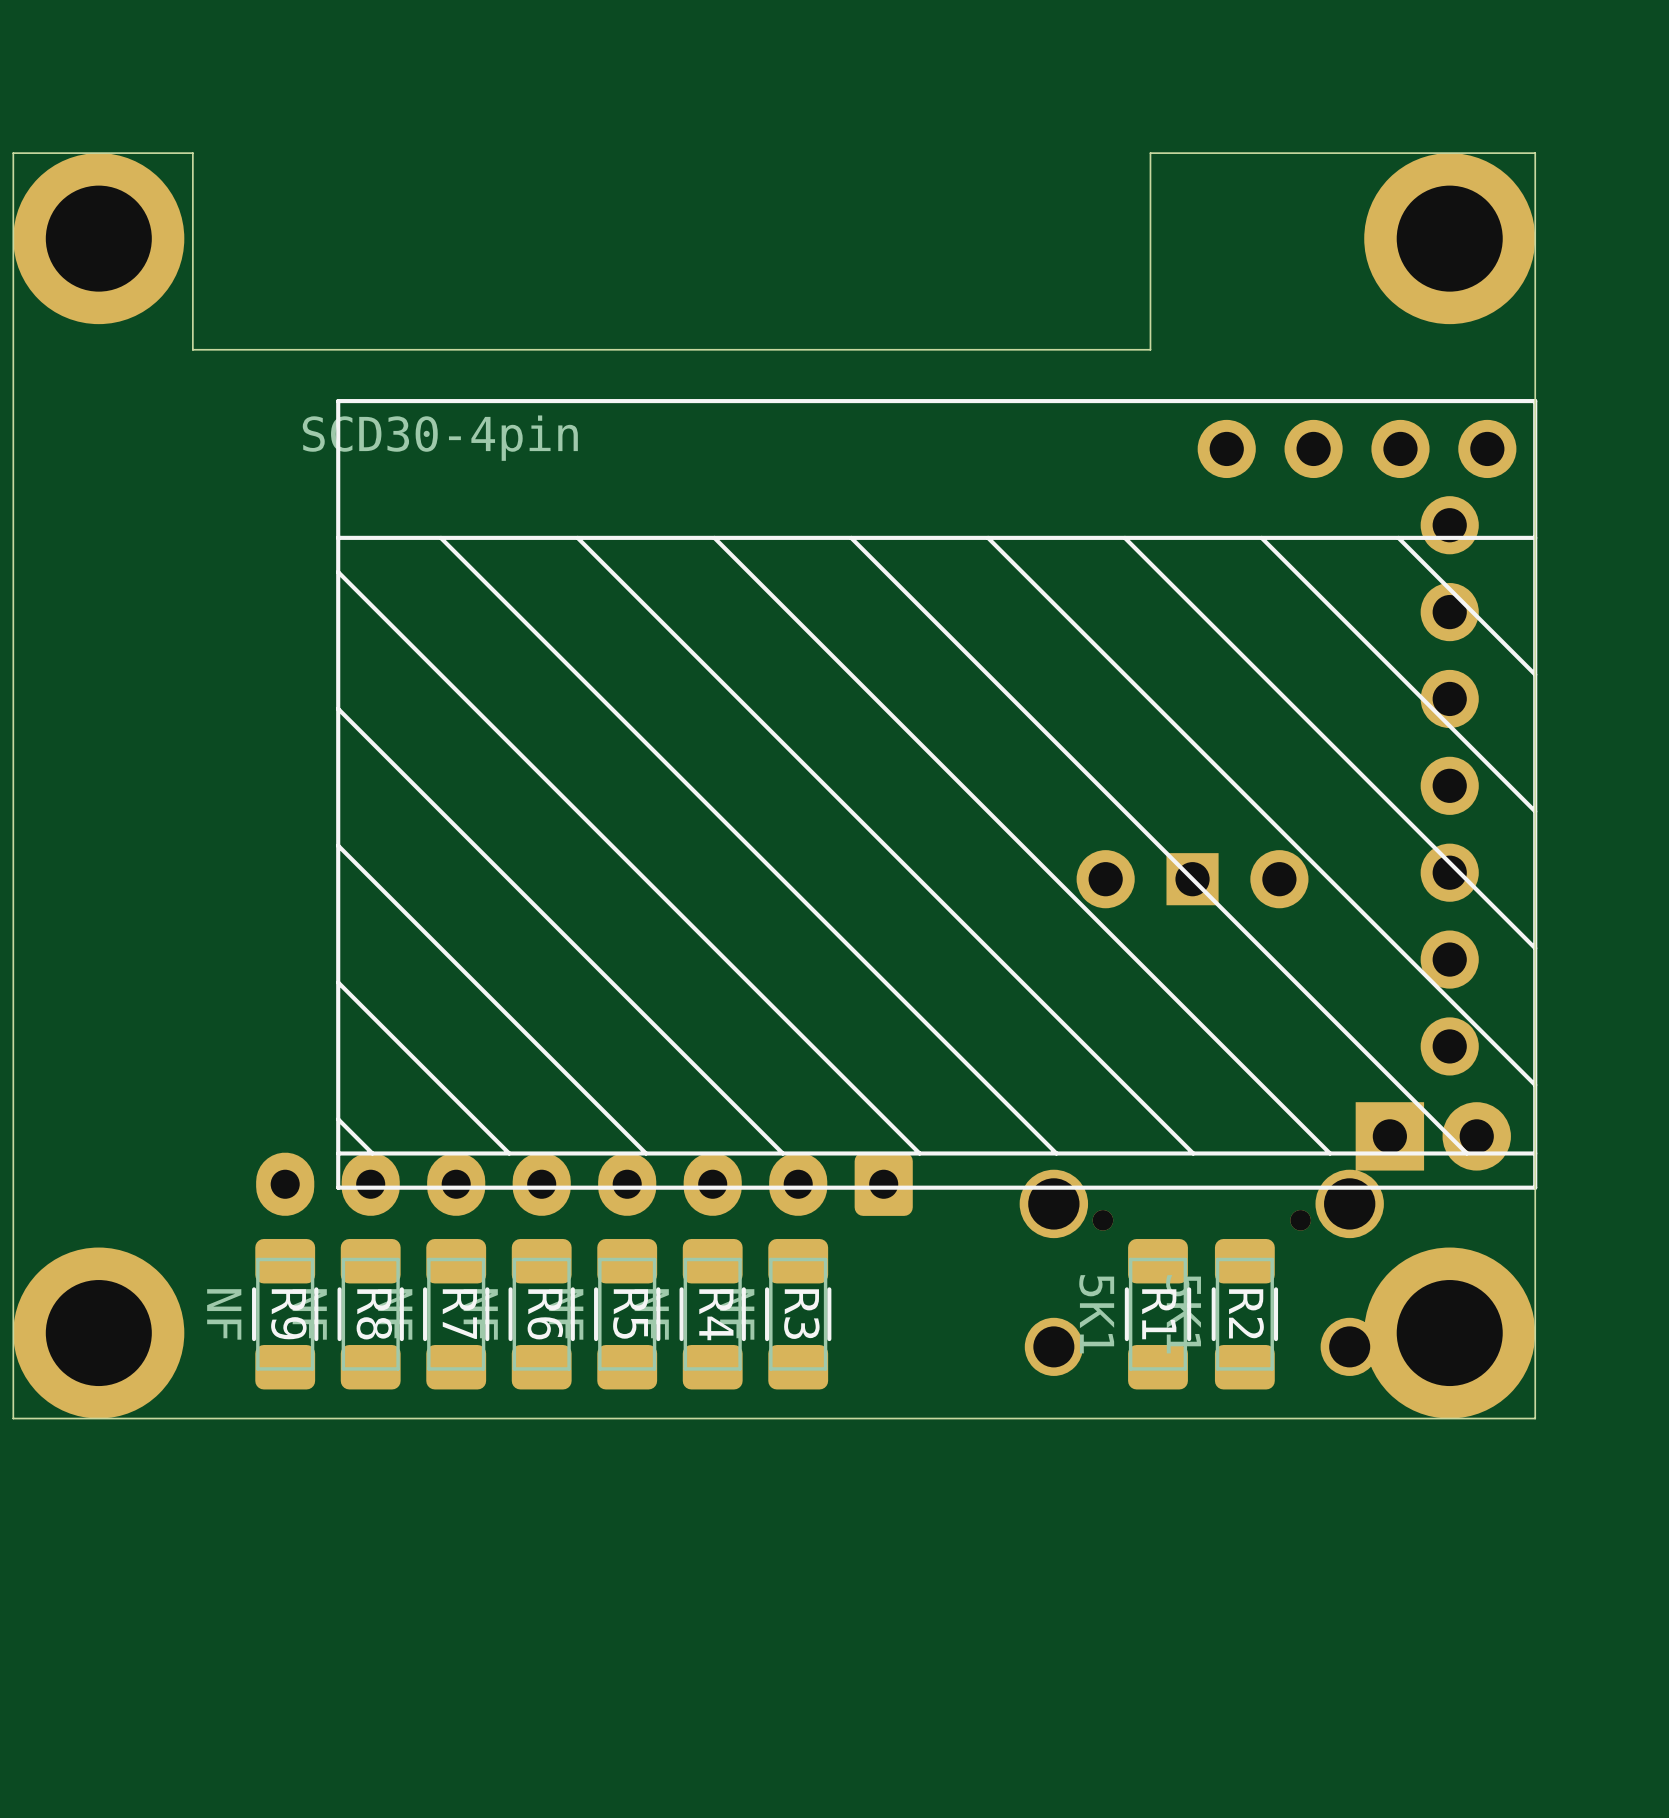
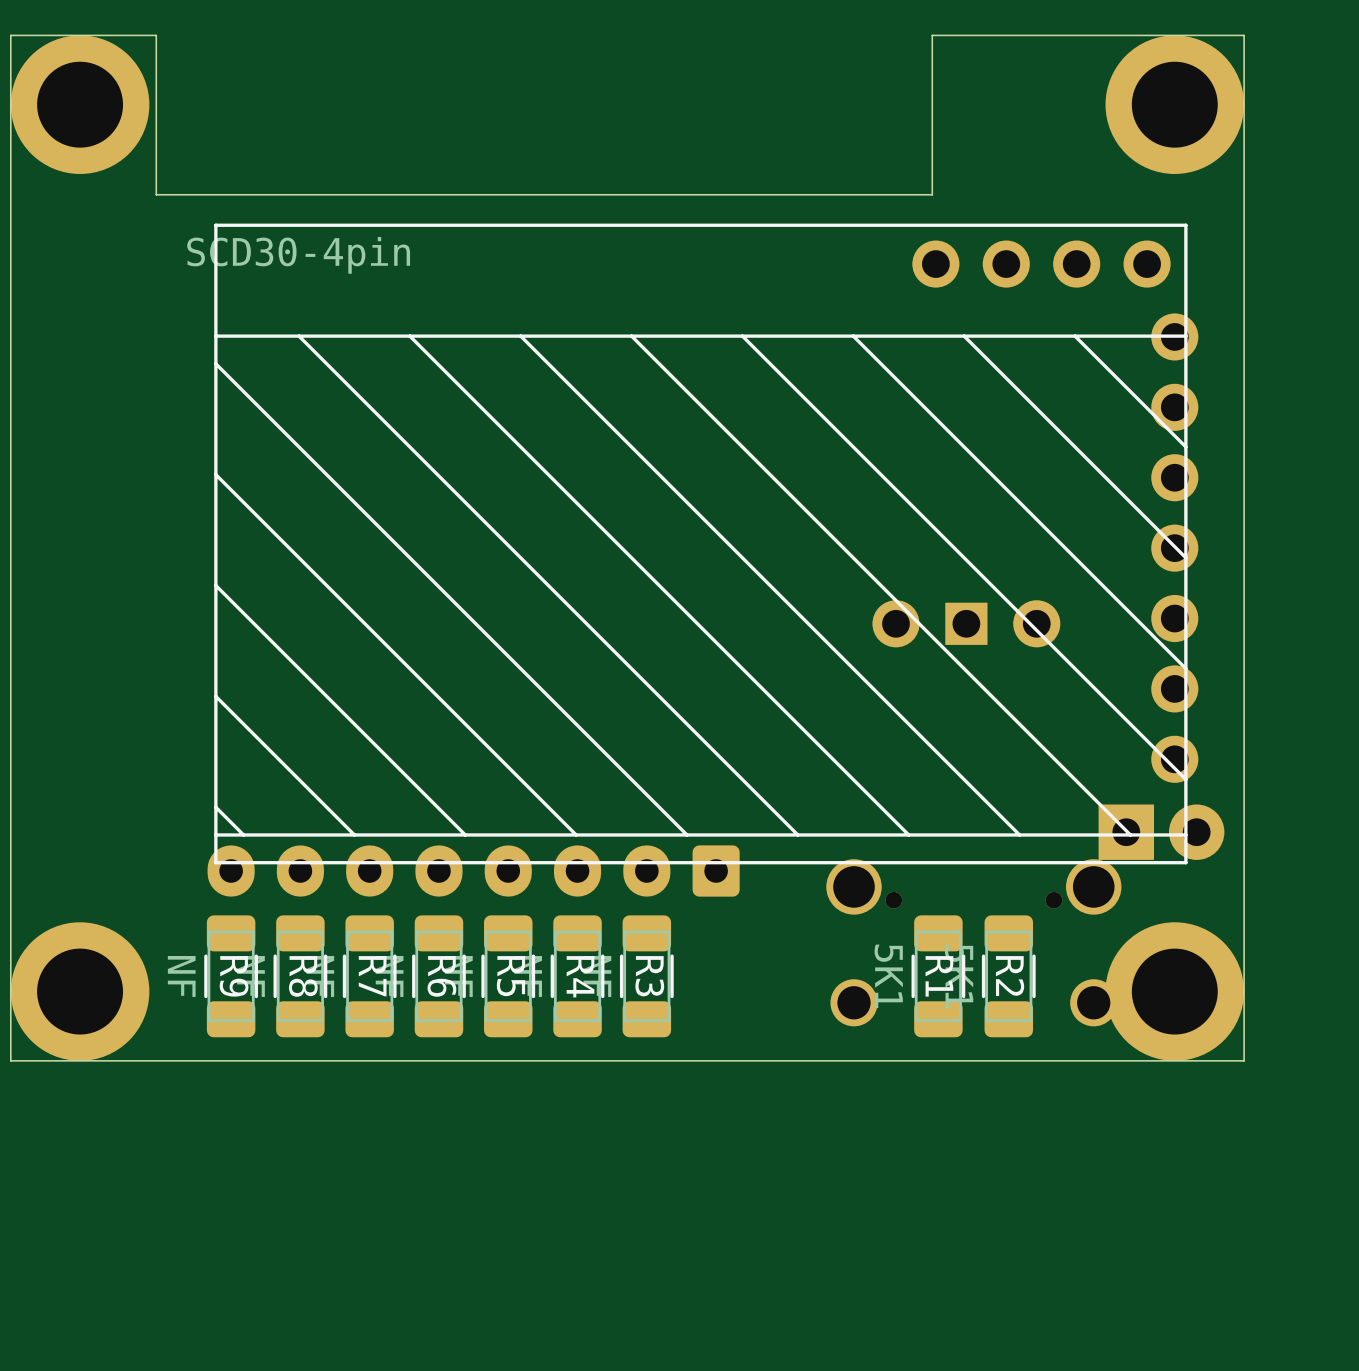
part position: (936, 794) -> (700, 543)

